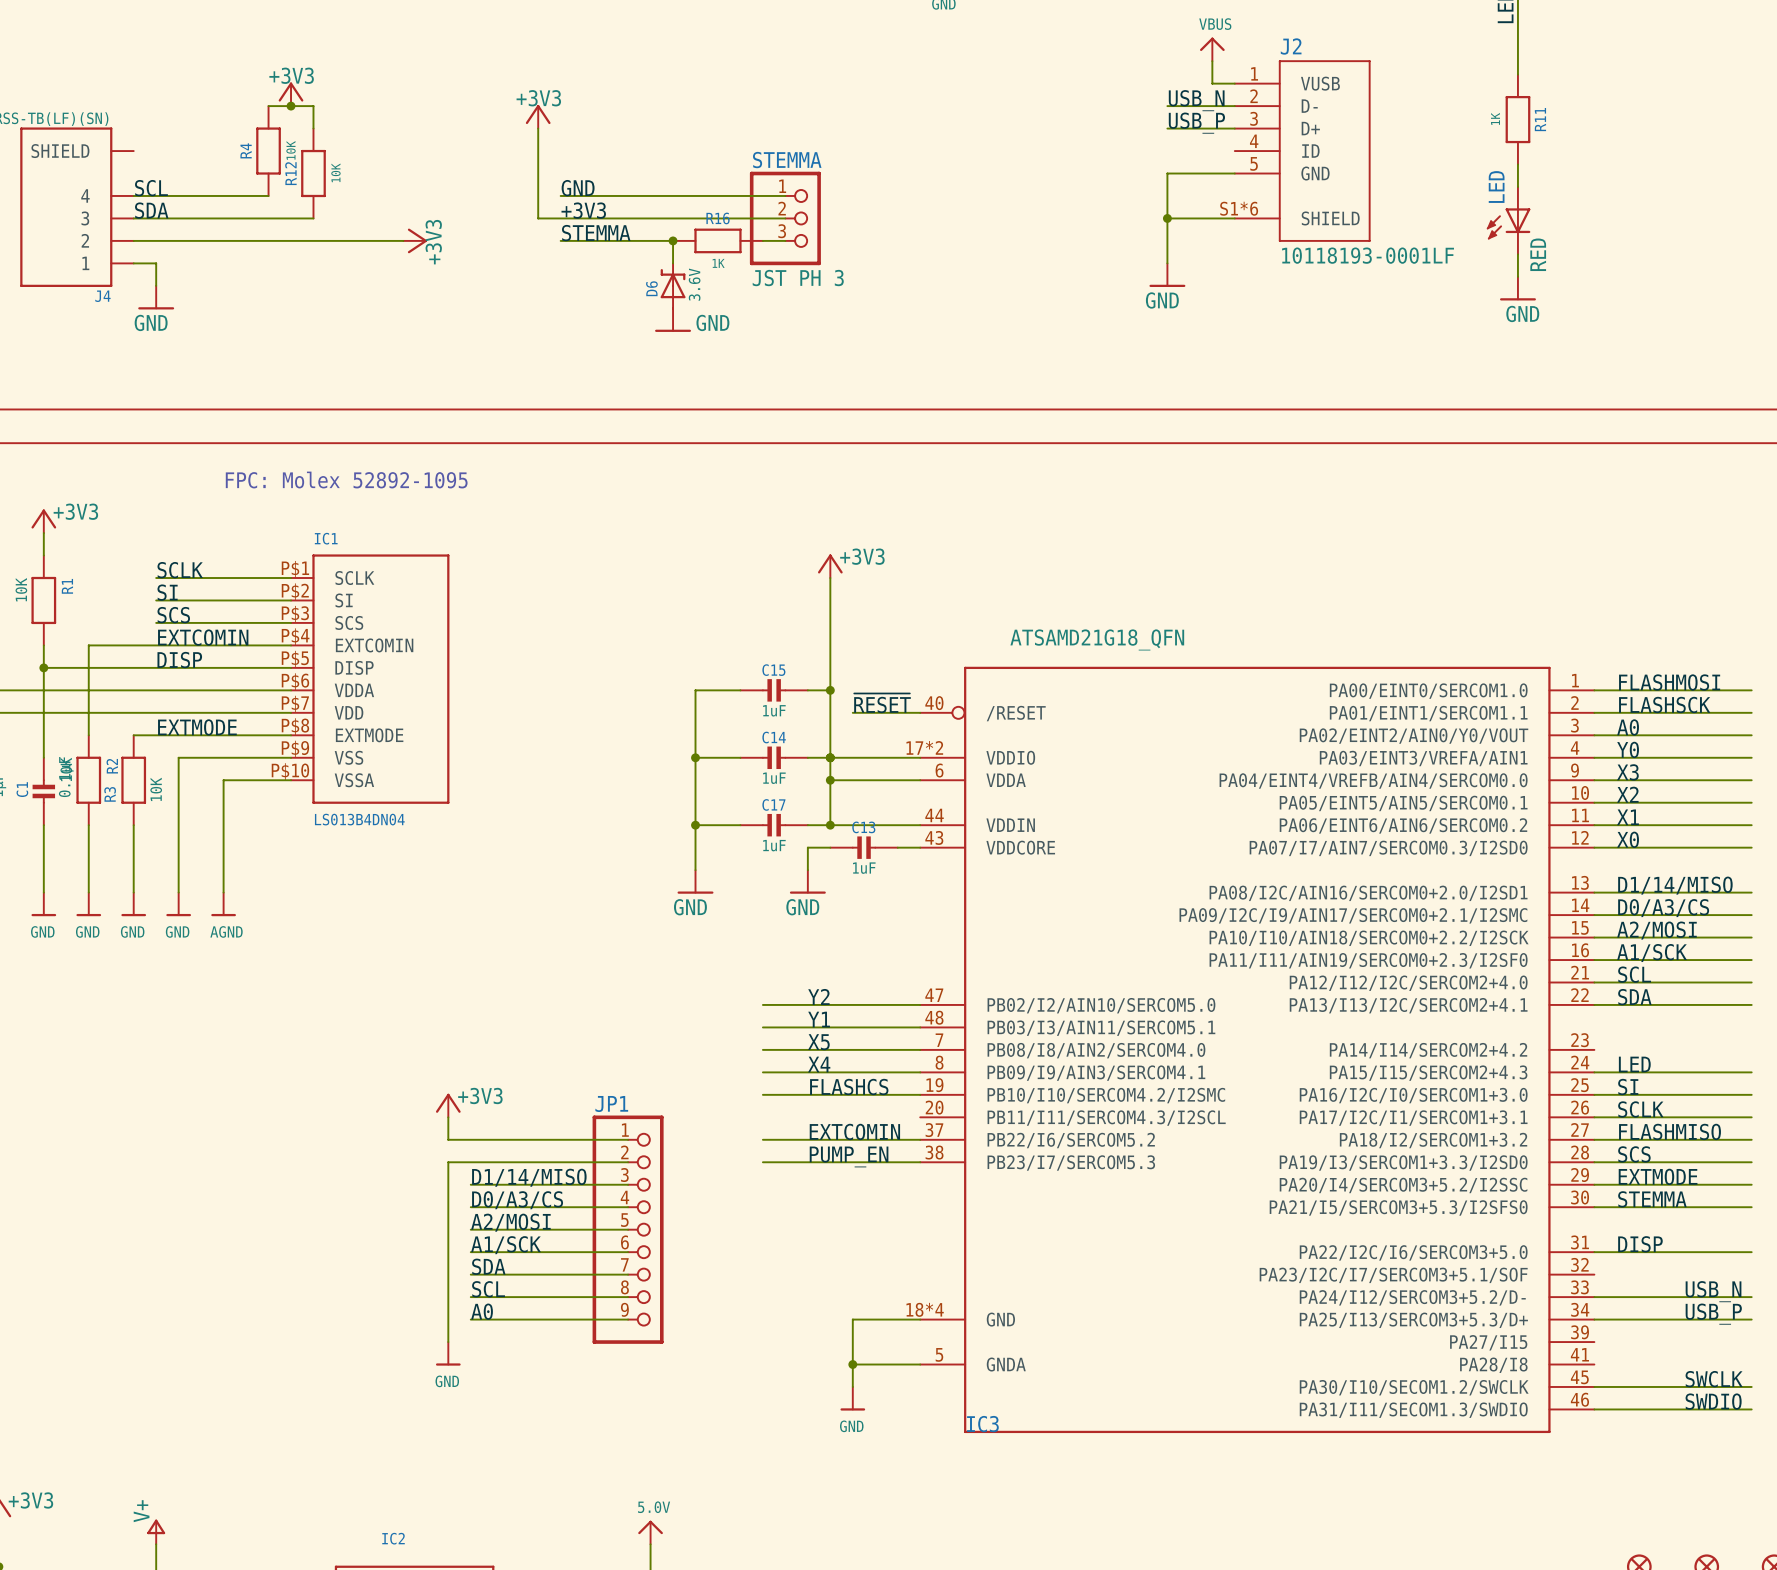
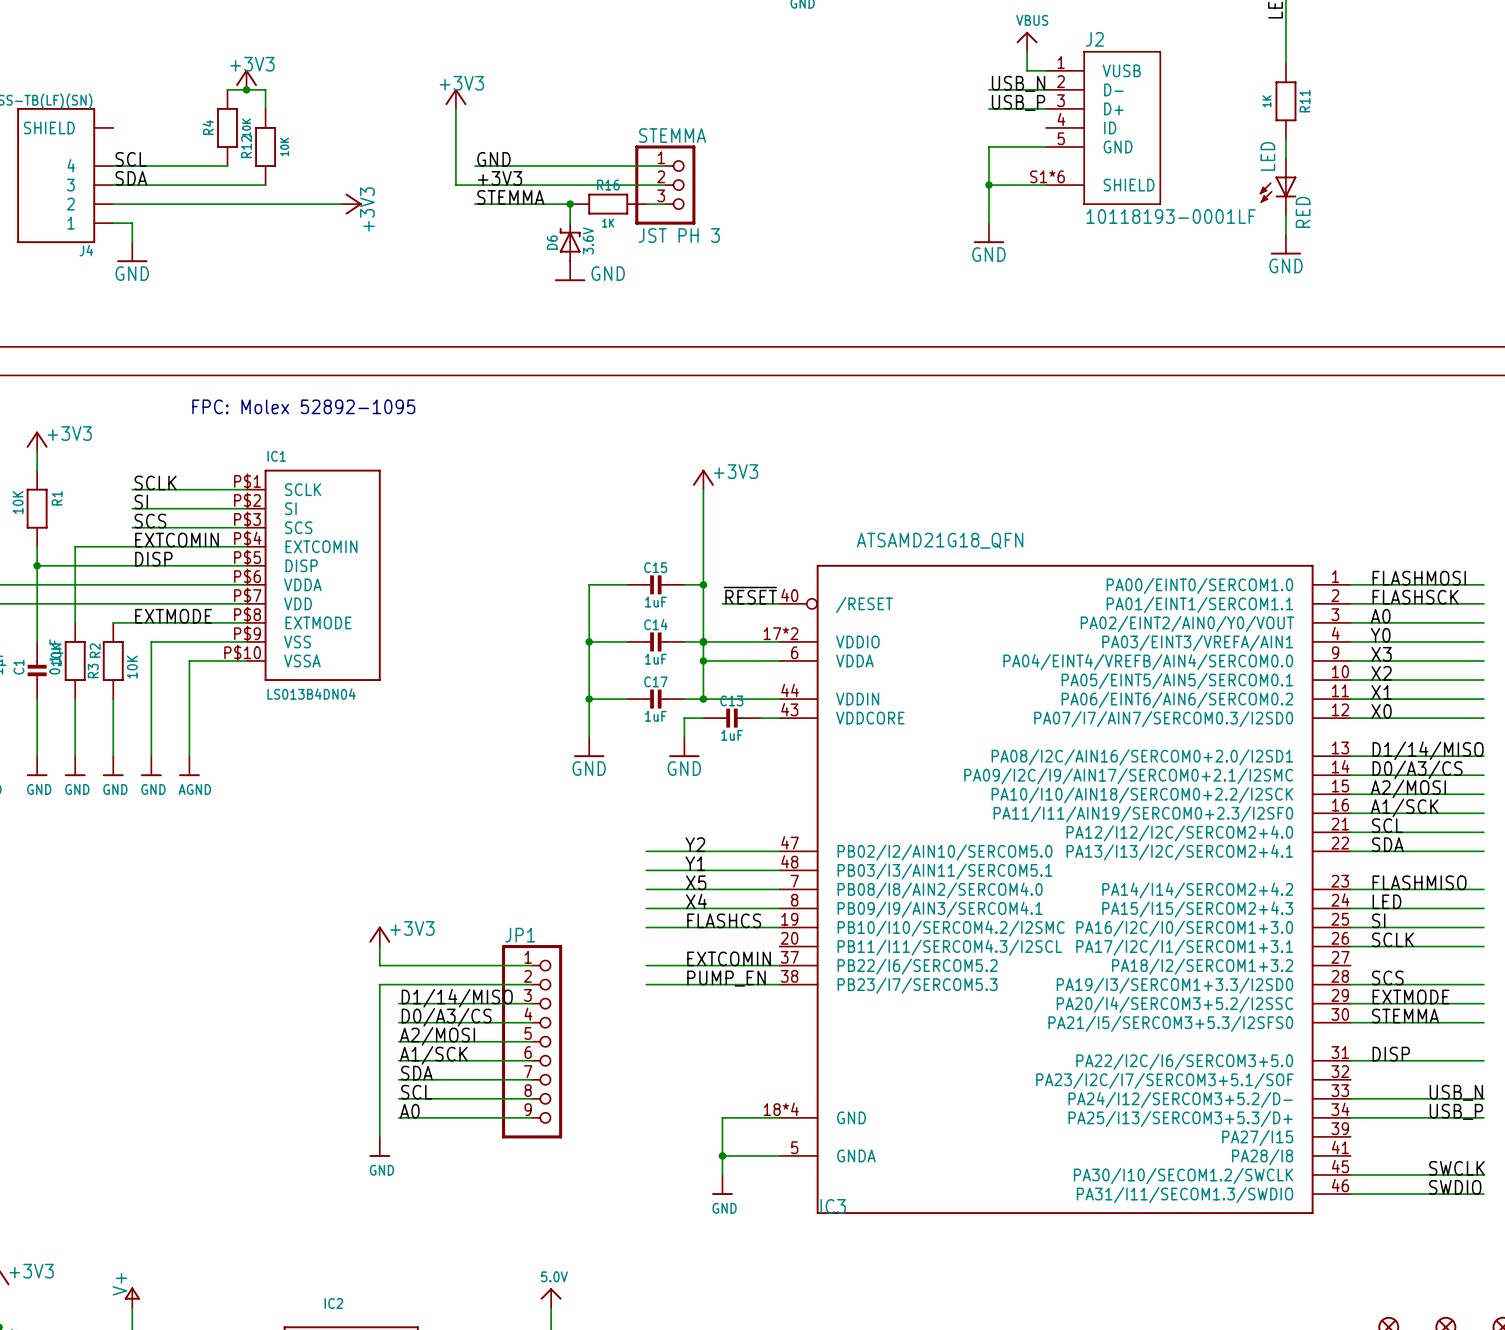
label position: FLASHMISO (1670, 1131) -> FLASHMISO (1419, 882)
wire: (1594, 1139) (1751, 1139) -> (1350, 889) (1483, 889)

